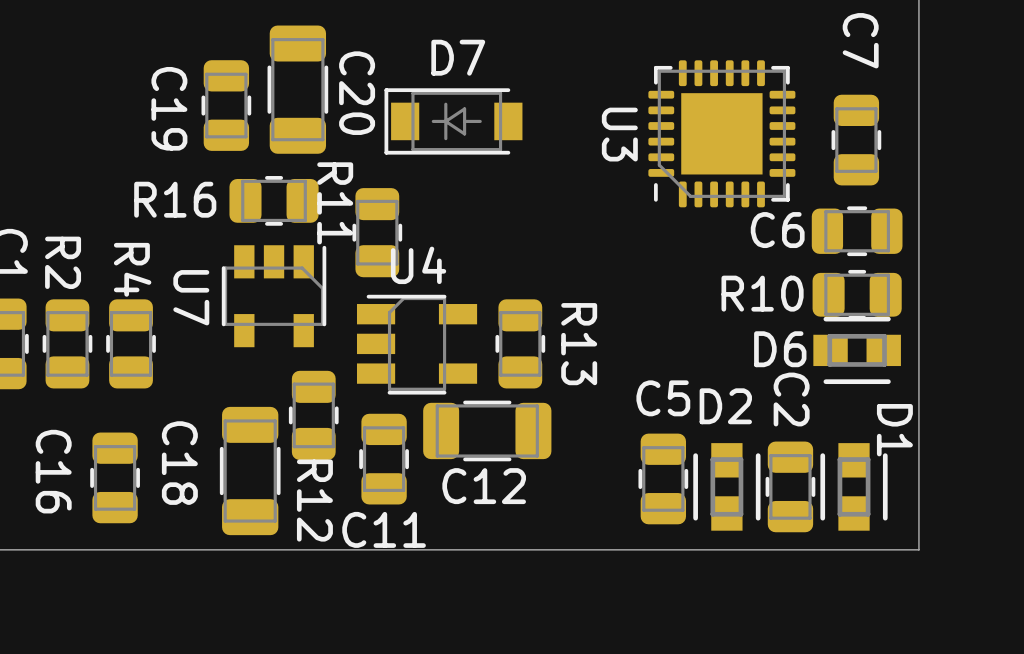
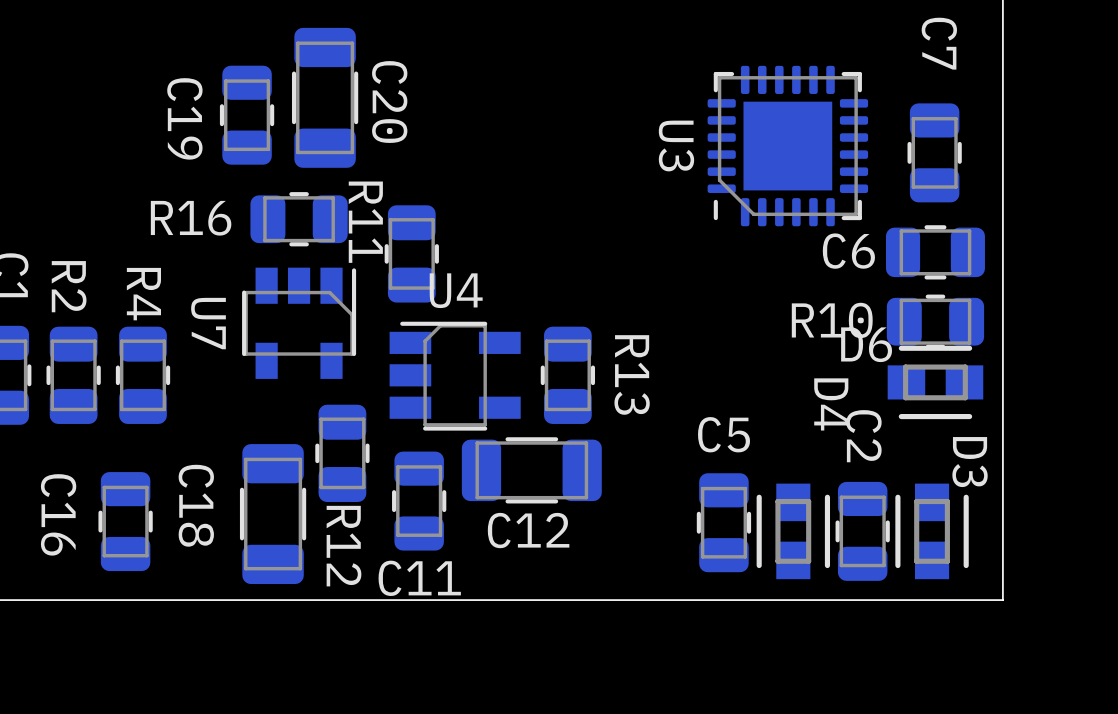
D7: (453, 121) -> none
D6 name position: D6 (780, 349) -> D6 (866, 344)
D2 name: D2 (725, 406) -> D4 (831, 404)
D1 name: D1 (894, 430) -> D3 (970, 462)

